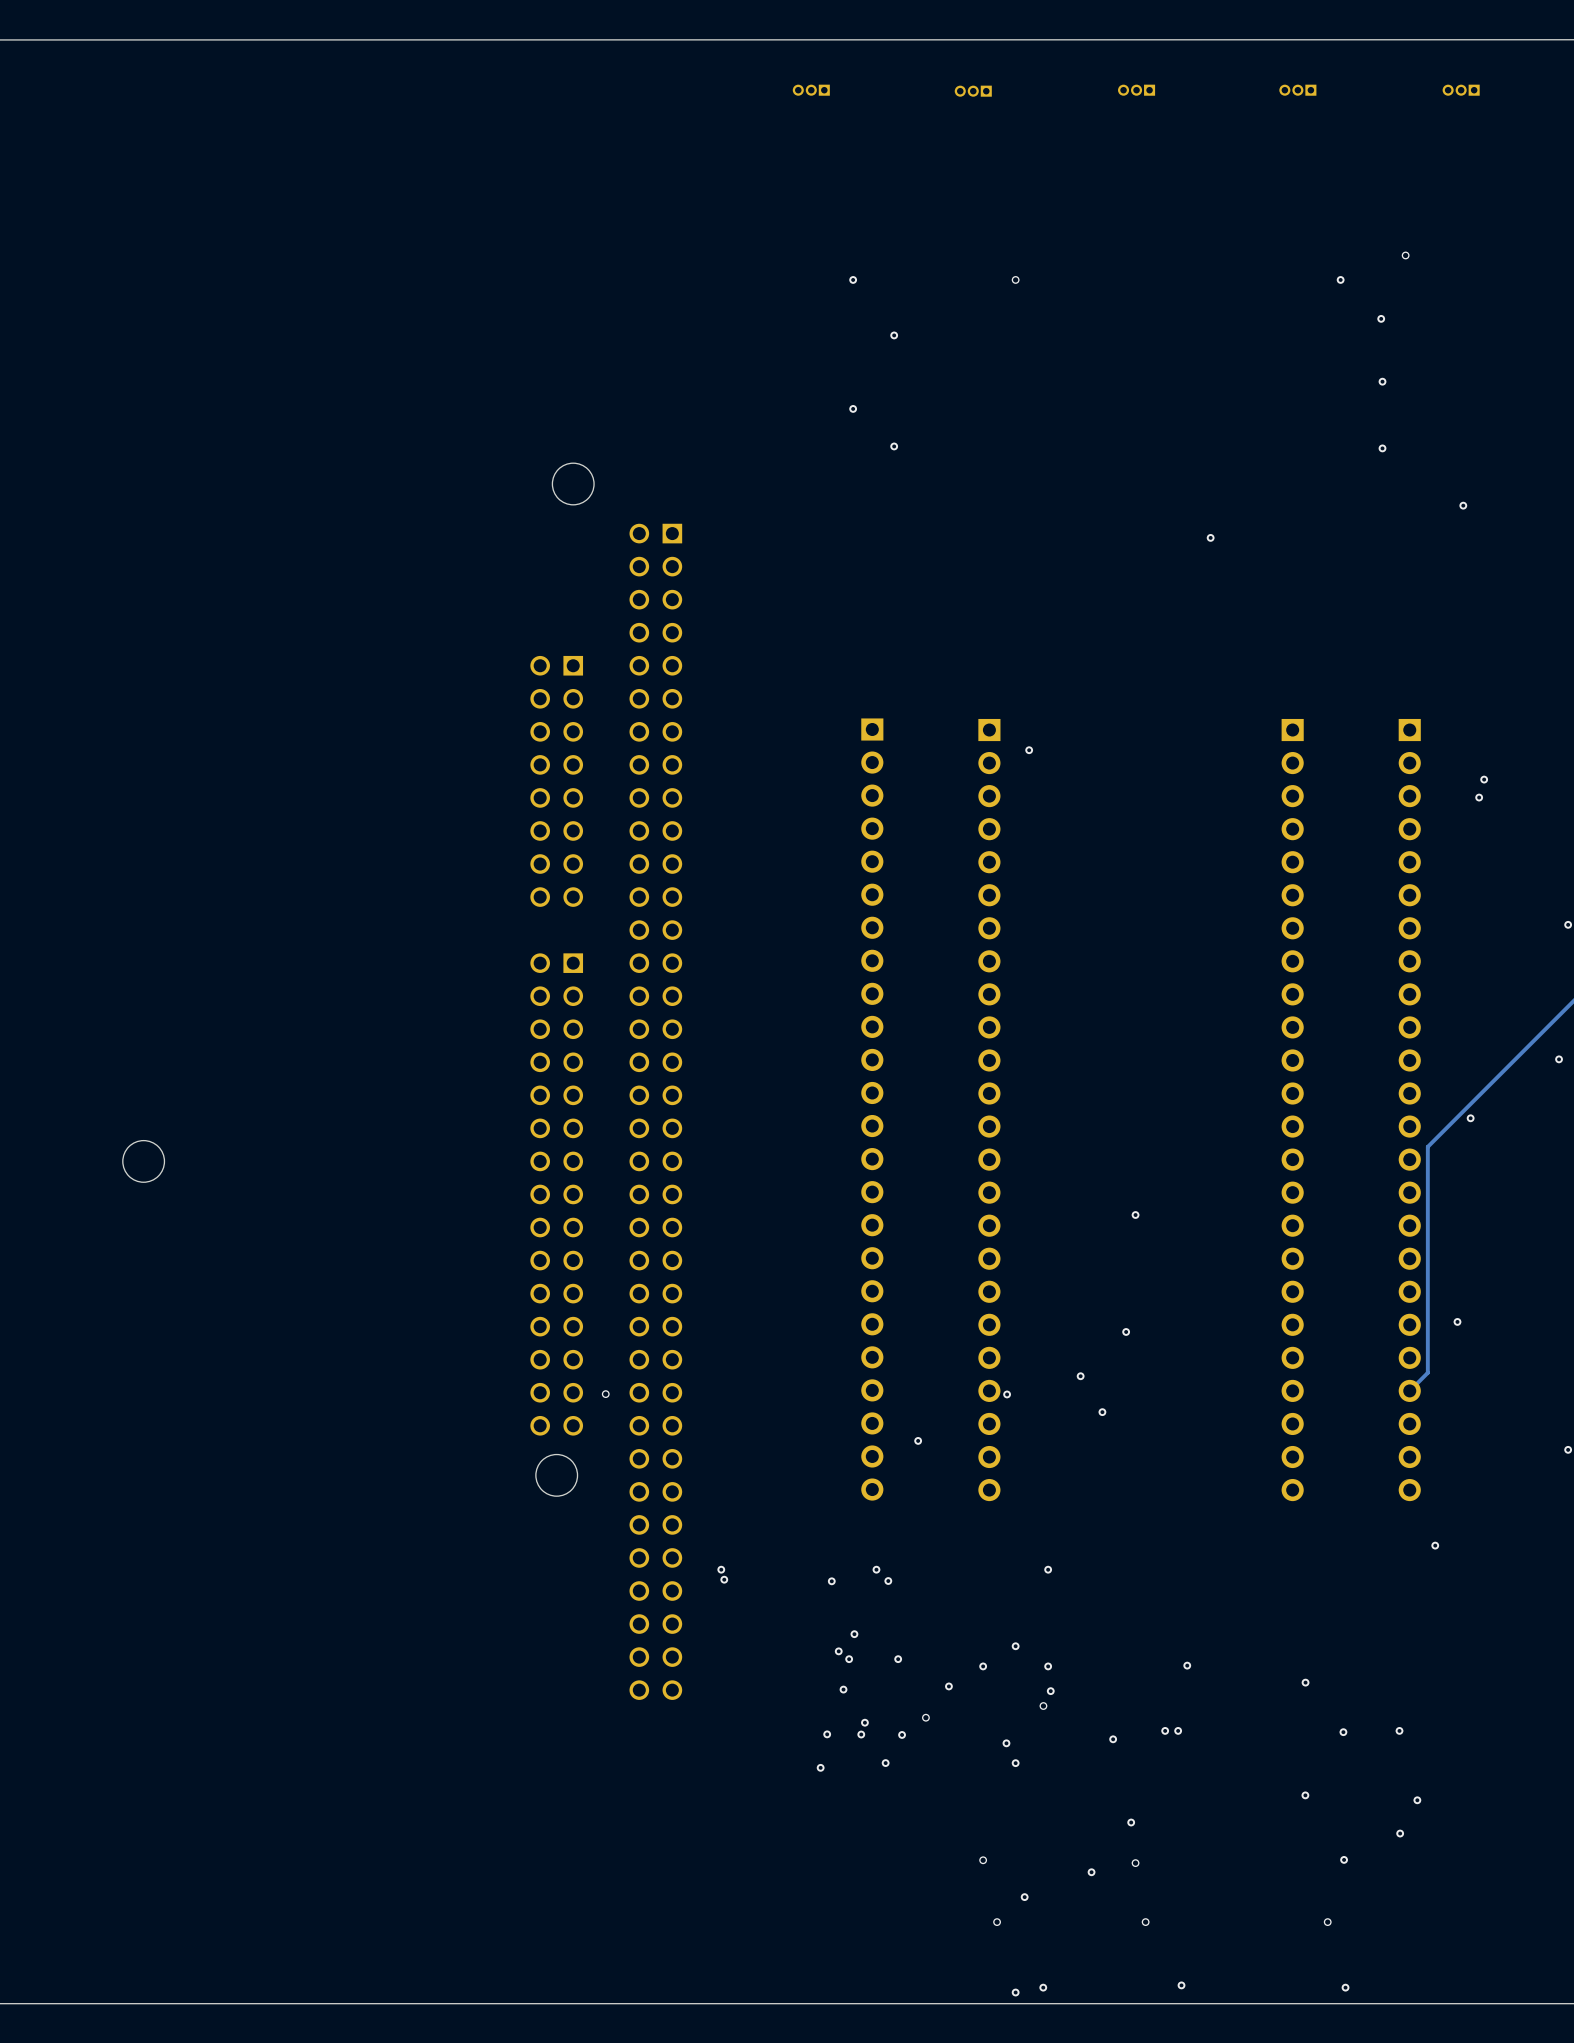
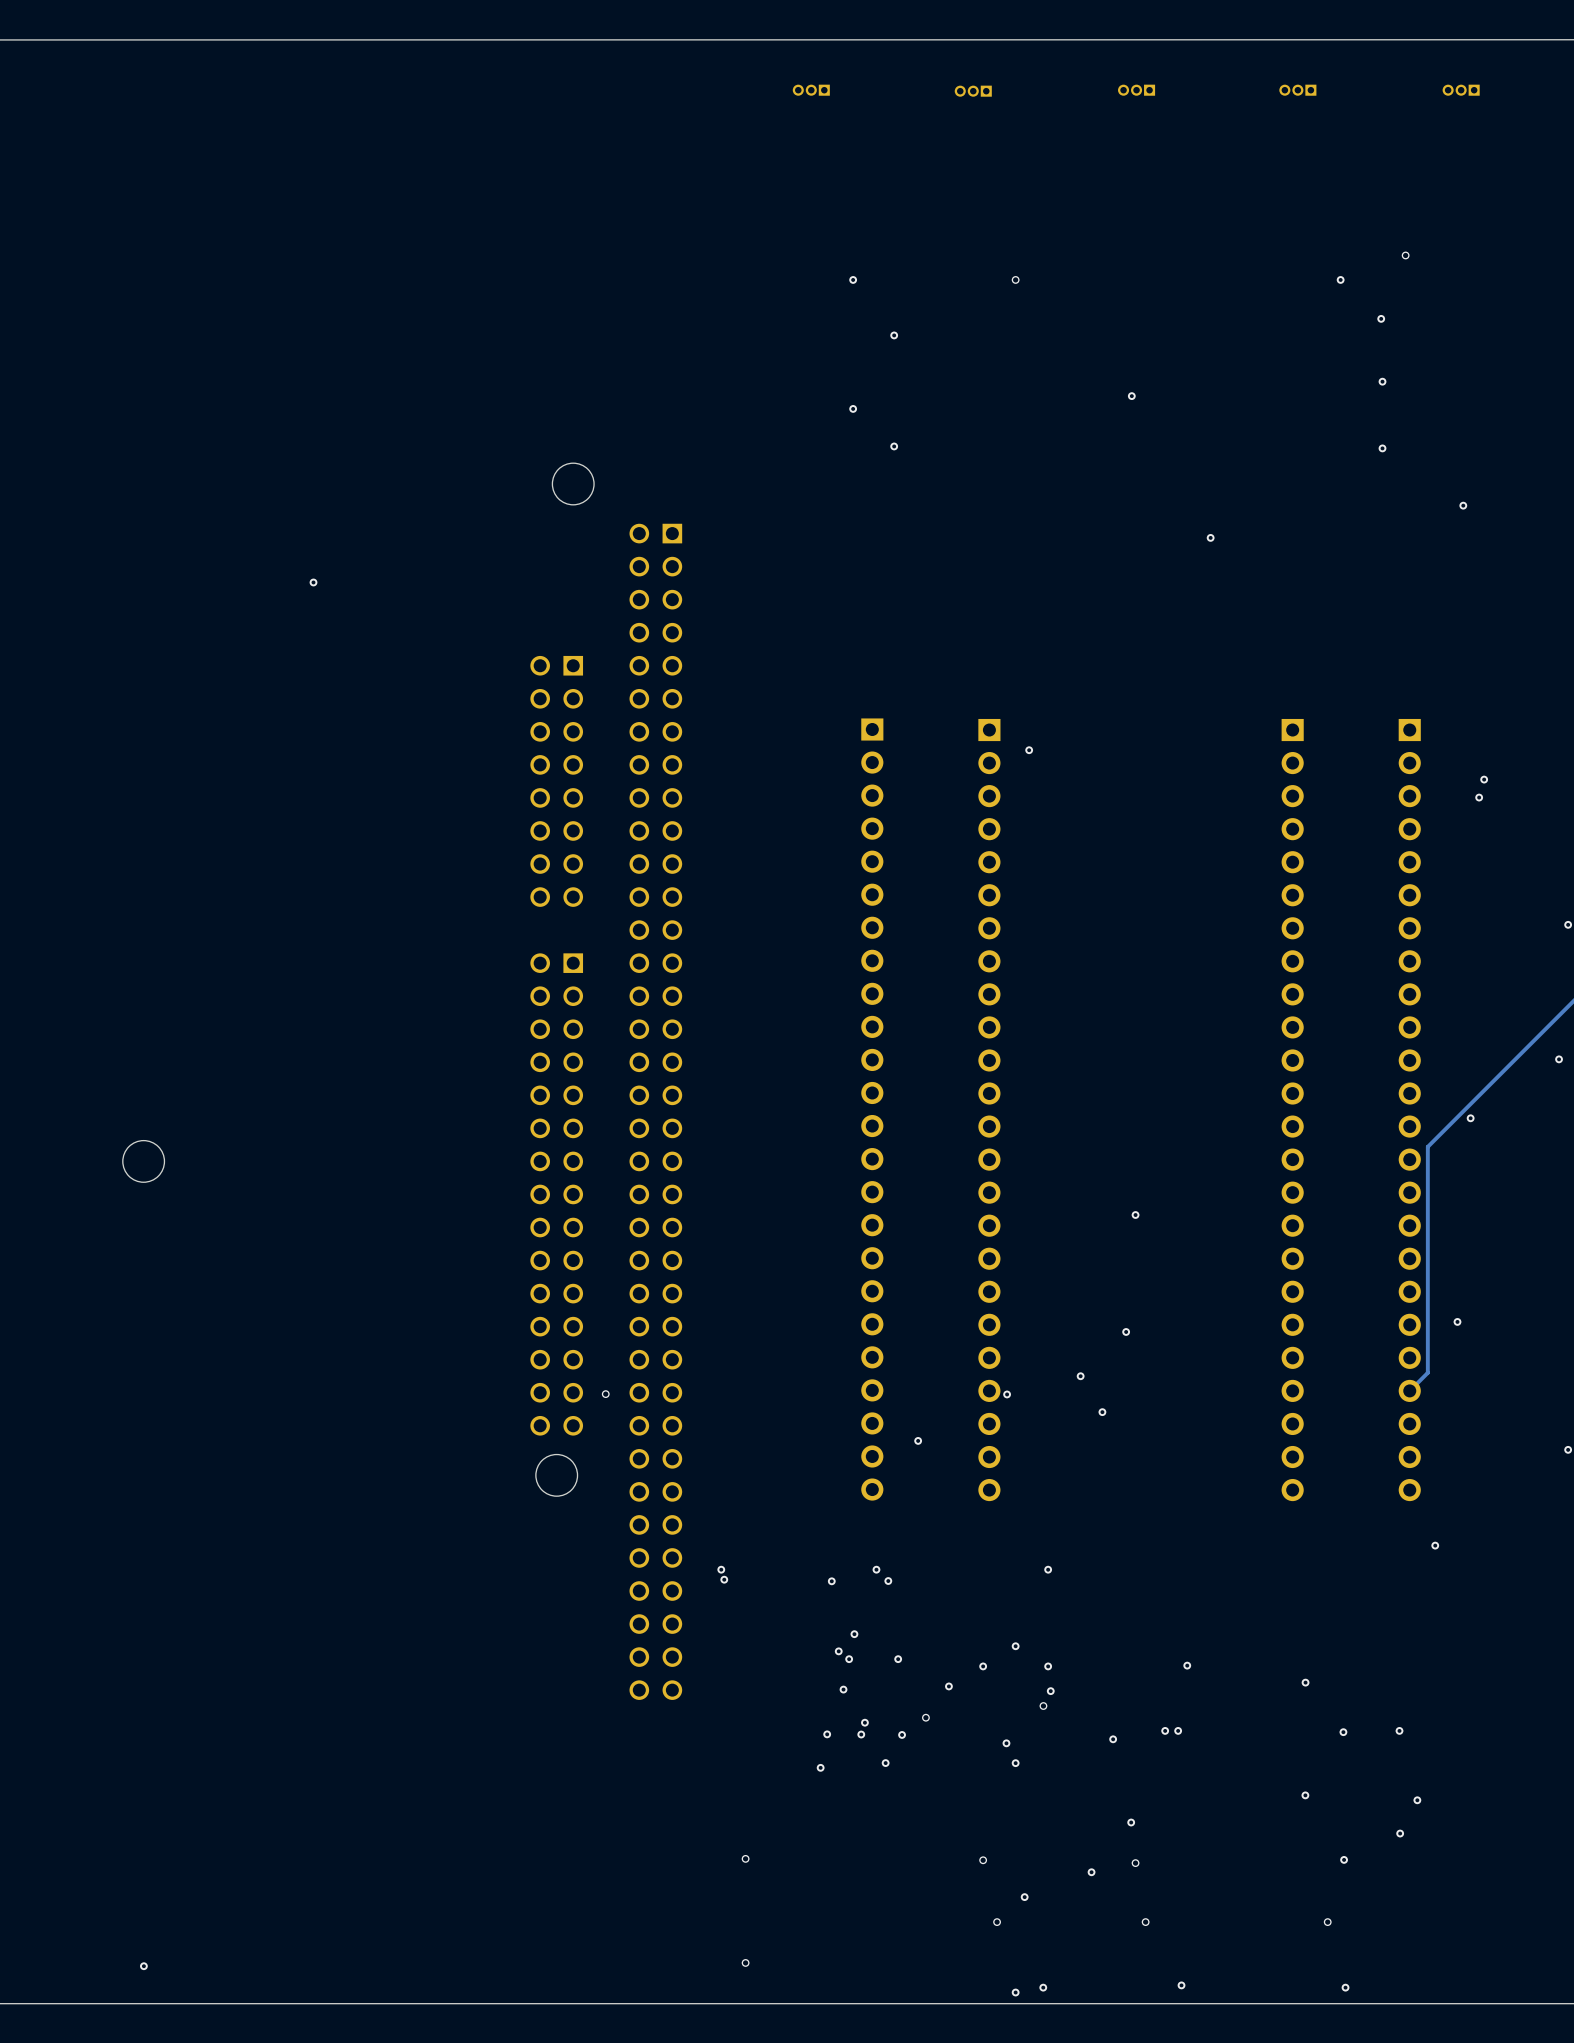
via: none -> (1131, 396)
via: none -> (313, 582)
via: none -> (745, 1858)
via: none -> (745, 1962)
via: none -> (143, 1966)

